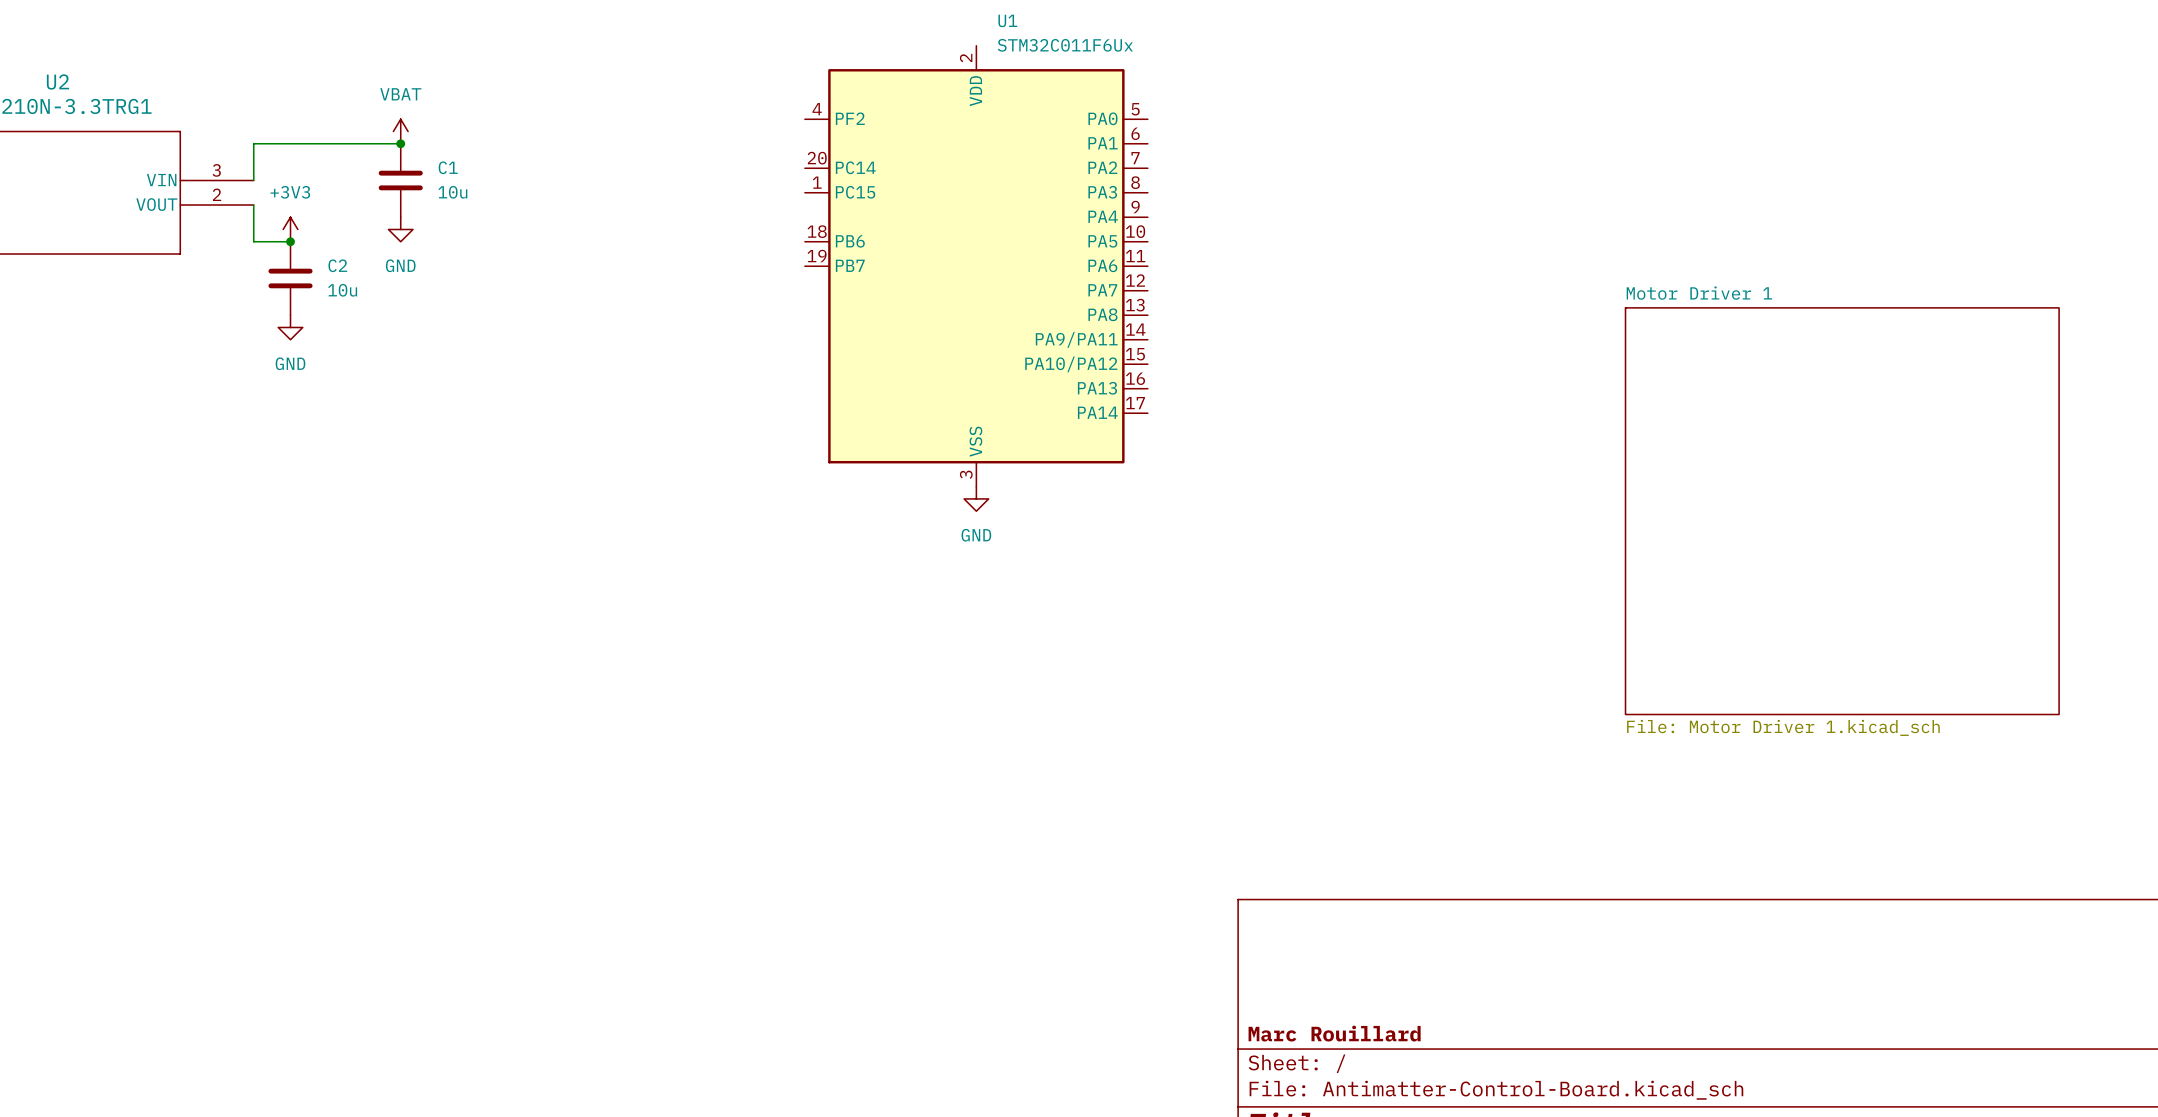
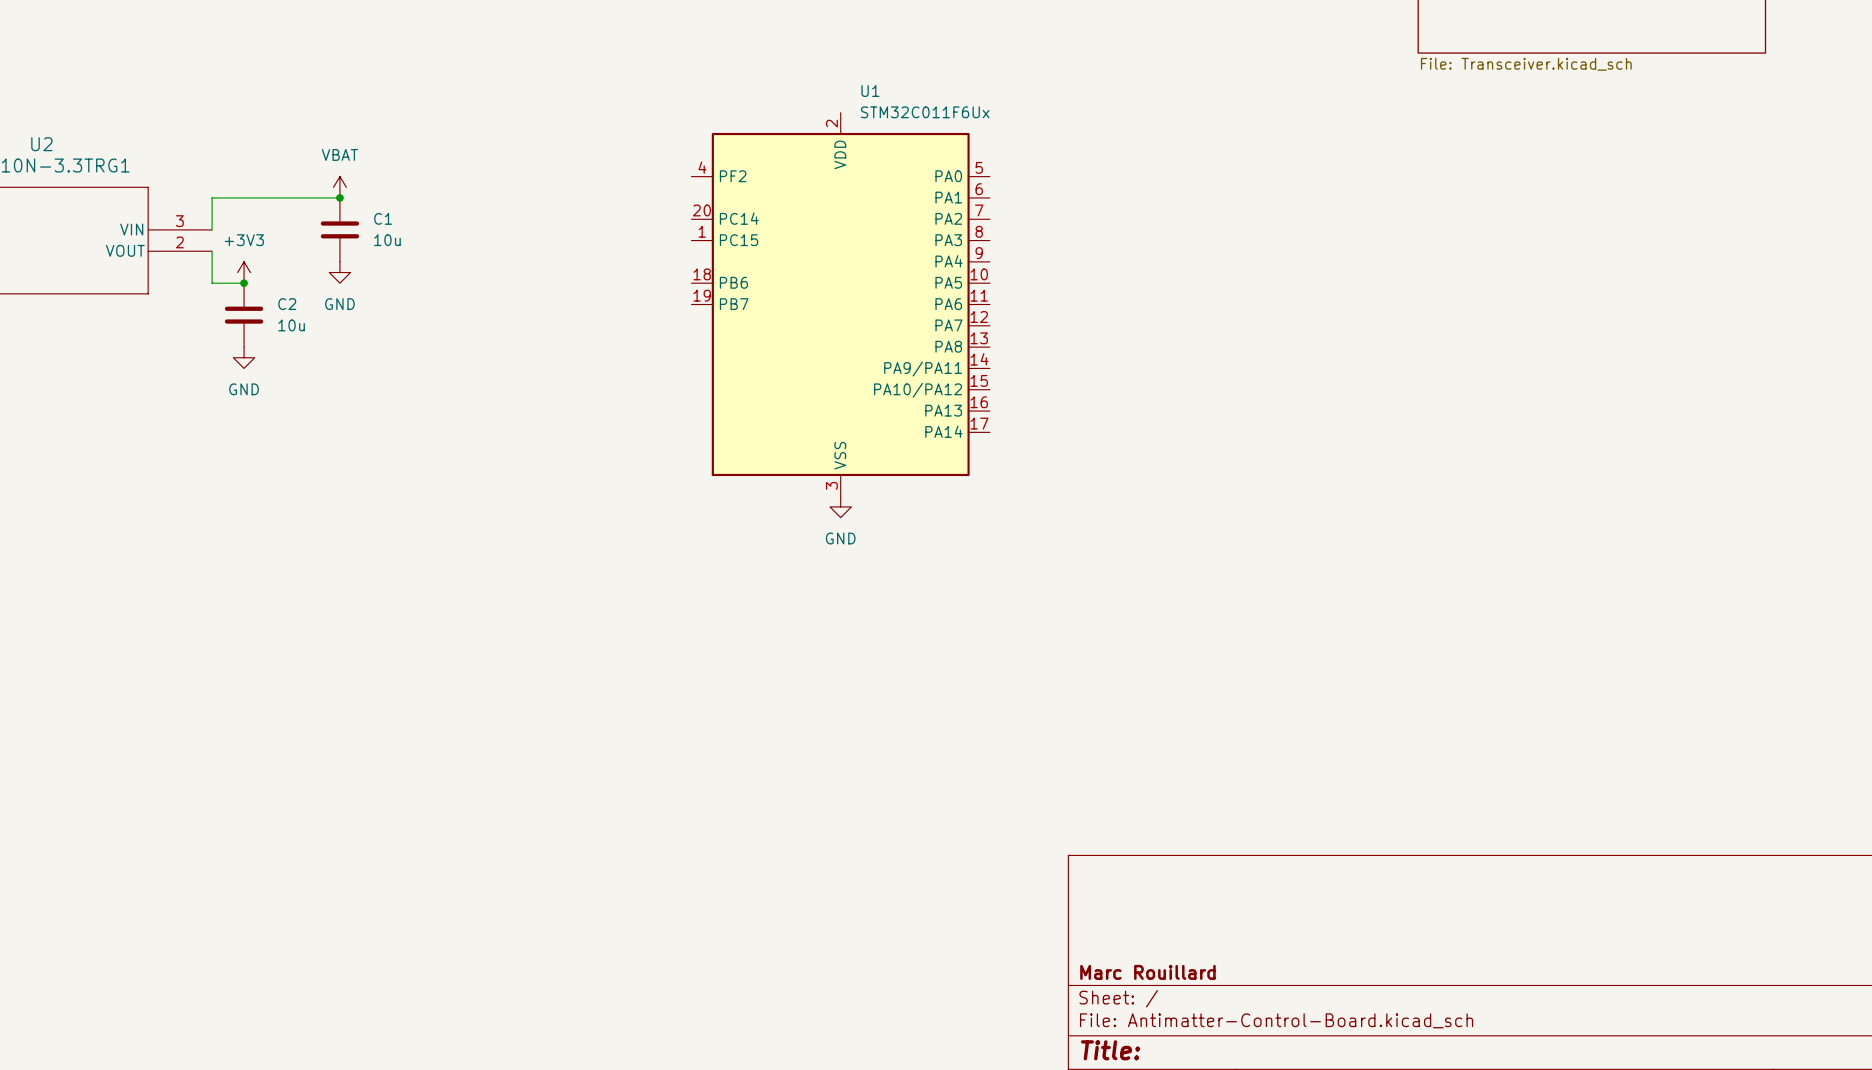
sheet Motor Driver 1: File: Motor Driver 1.kicad_sch (1842, 511) -> none

